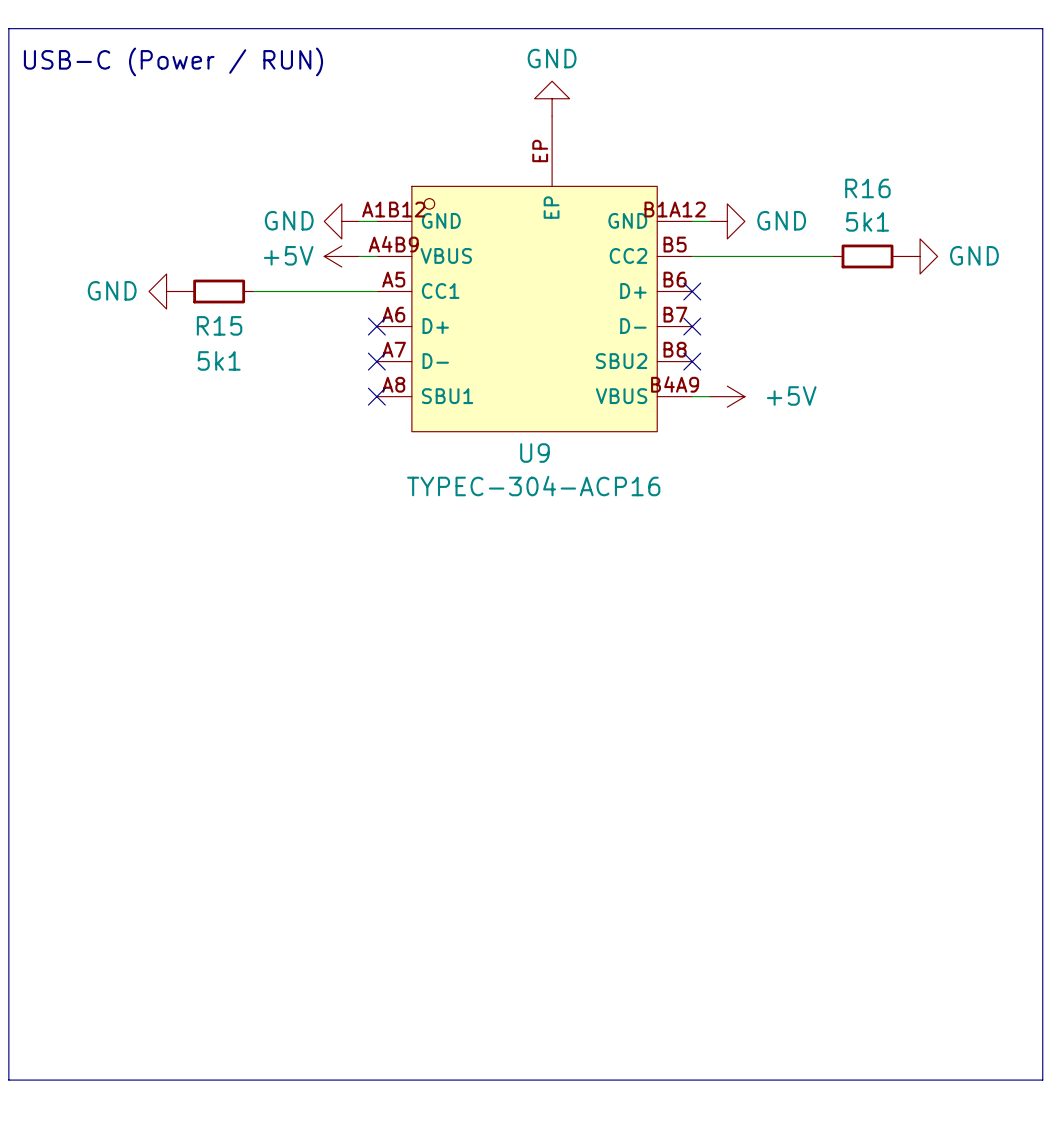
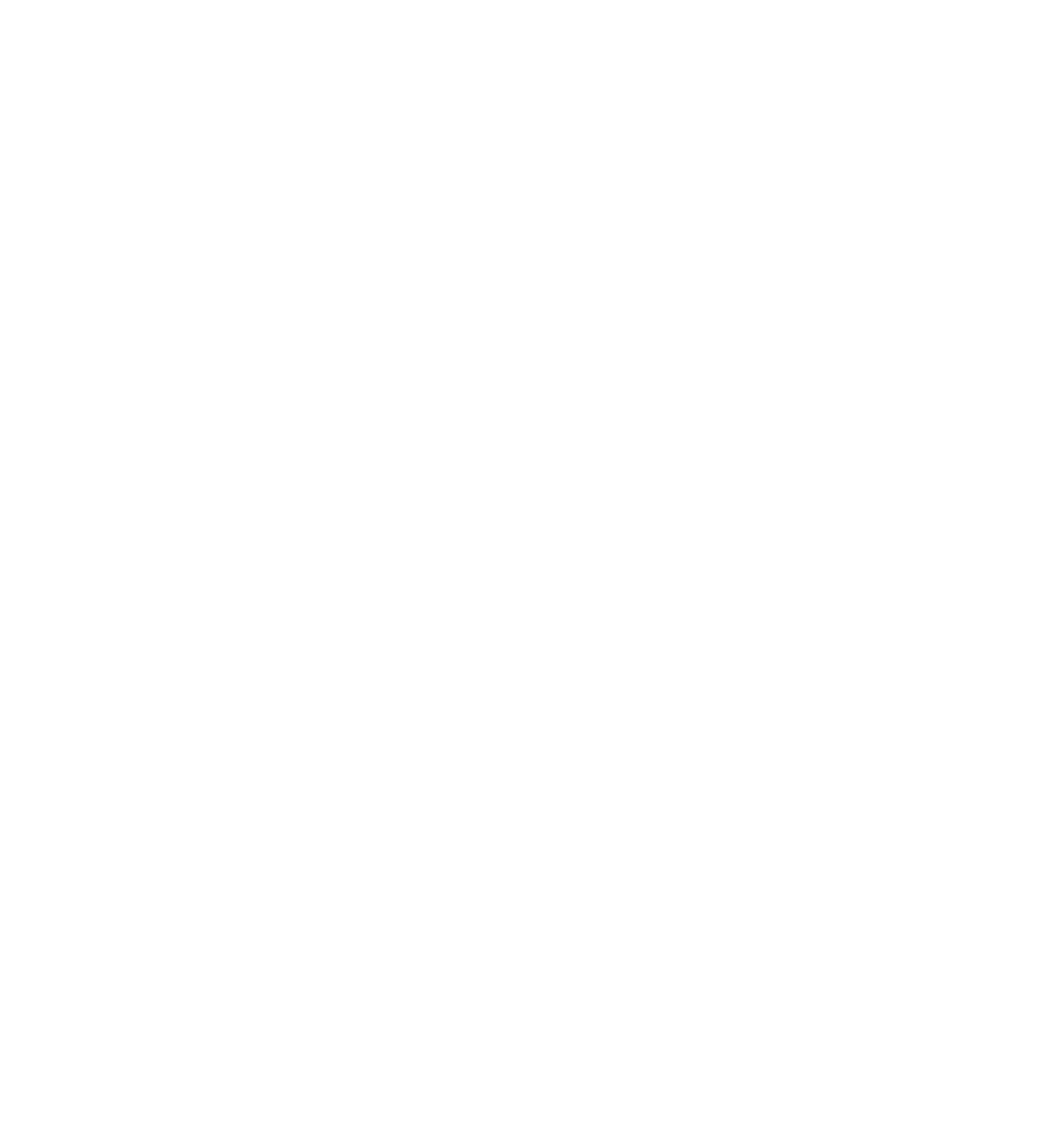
line: (8, 28) (1042, 28) (1042, 1080) (8, 1080) (8, 28) -> none
text: USB-C (Power / RUN) (173, 61) -> none
power symbol: GND (552, 98) -> none
power symbol: GND (341, 221) -> none
wire: (359, 221) (376, 221) -> none
wire: (692, 221) (709, 221) -> none
power symbol: GND (727, 221) -> none
power symbol: +5V (341, 256) -> none
wire: (359, 256) (376, 256) -> none
wire: (692, 256) (832, 256) -> none
R16: 5k1 (867, 256) -> none
power symbol: GND (920, 256) -> none
U9: TYPEC-304-ACP16 (534, 273) -> none
power symbol: GND (166, 291) -> none
R15: 5k1 (219, 291) -> none
wire: (254, 291) (376, 291) -> none
no-connect mark: (692, 291) -> none
no-connect mark: (376, 326) -> none
no-connect mark: (692, 326) -> none
no-connect mark: (376, 361) -> none
no-connect mark: (692, 361) -> none
no-connect mark: (376, 396) -> none
wire: (692, 396) (709, 396) -> none
power symbol: +5V (727, 396) -> none

